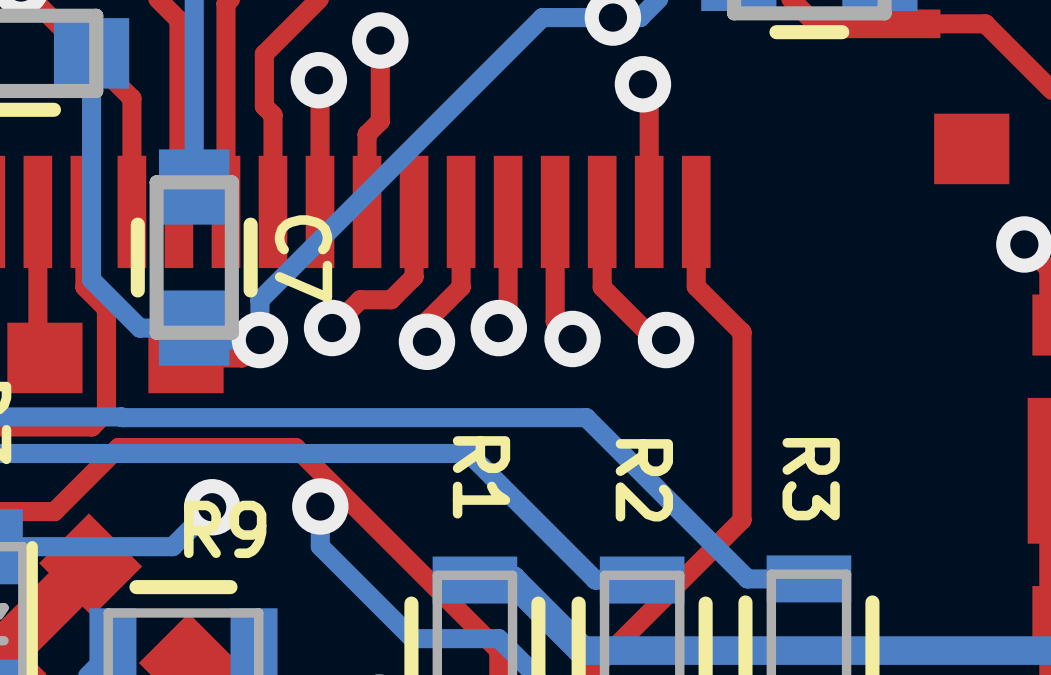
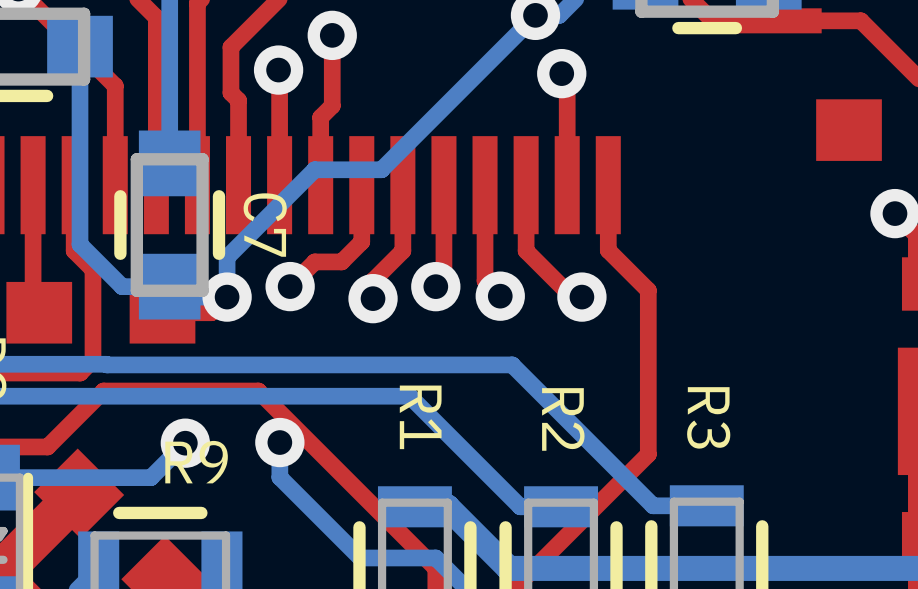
bottom track: (612, 17) (542, 17) (259, 300) -> (535, 15) (381, 169) (314, 169) (227, 257) (227, 262)

